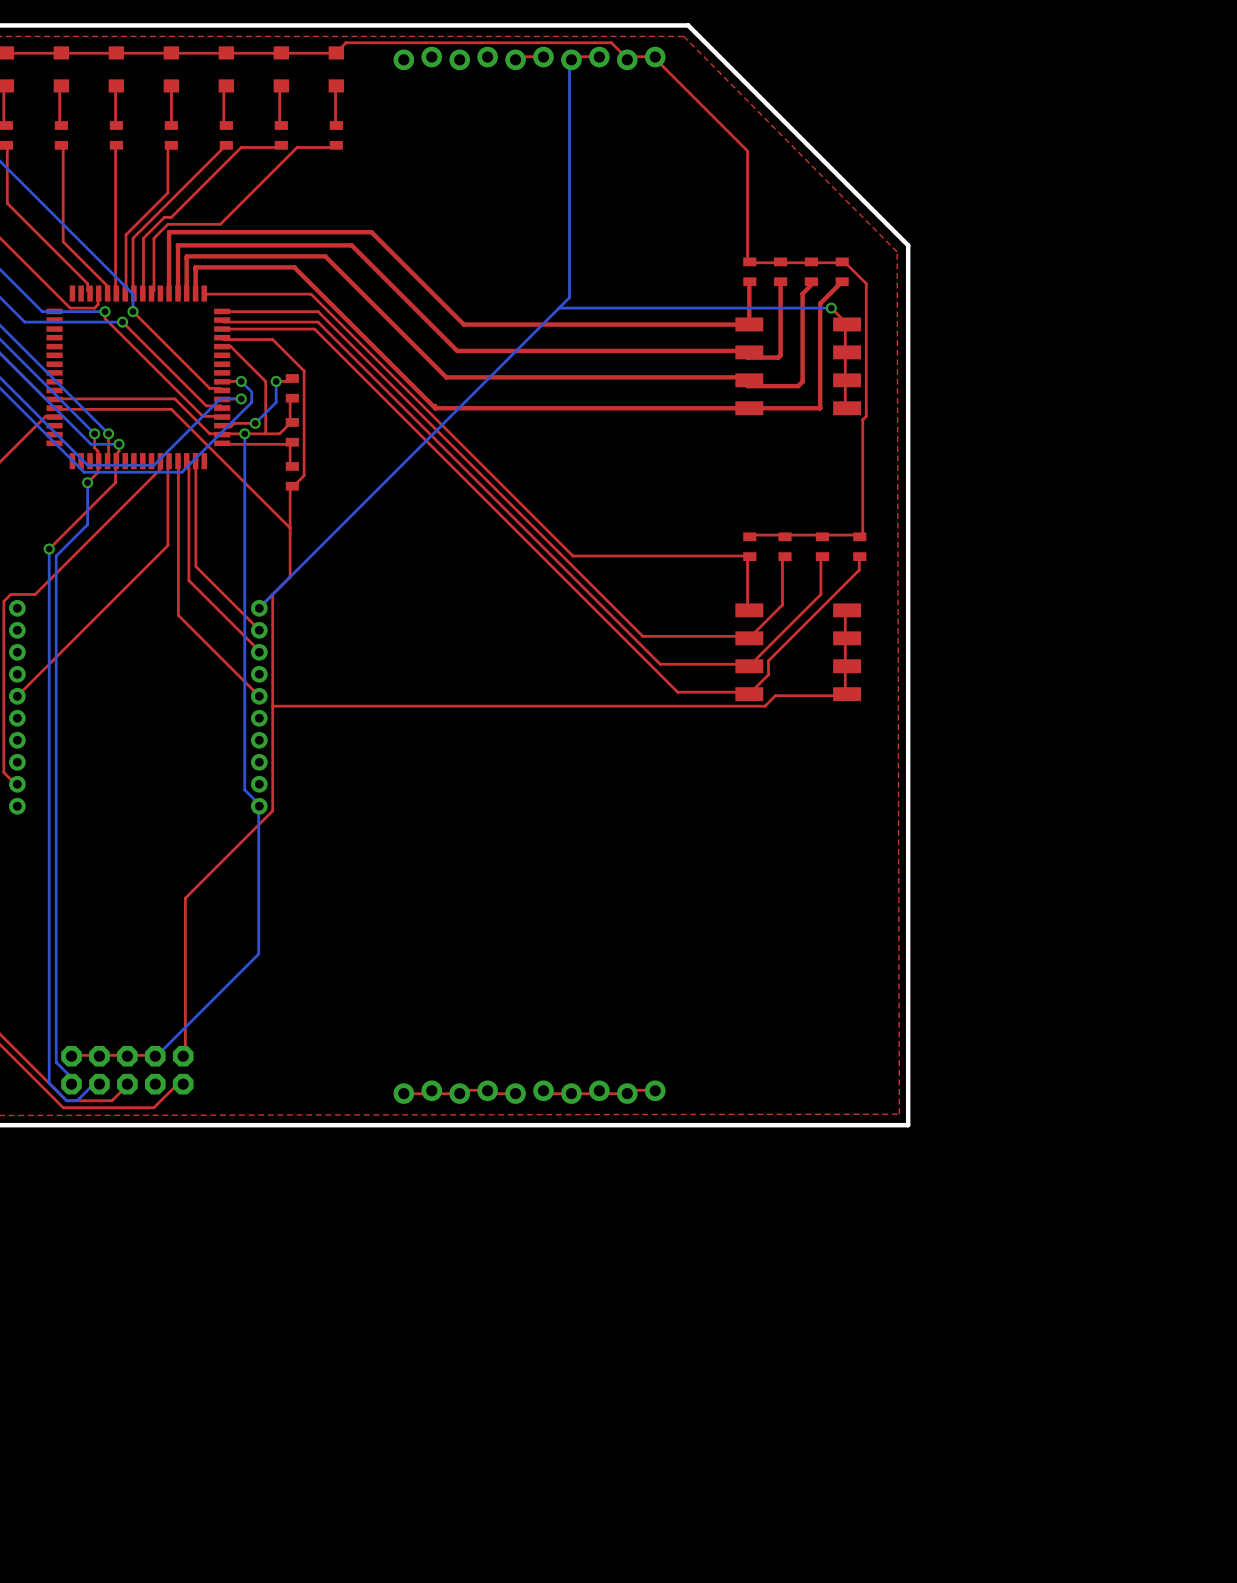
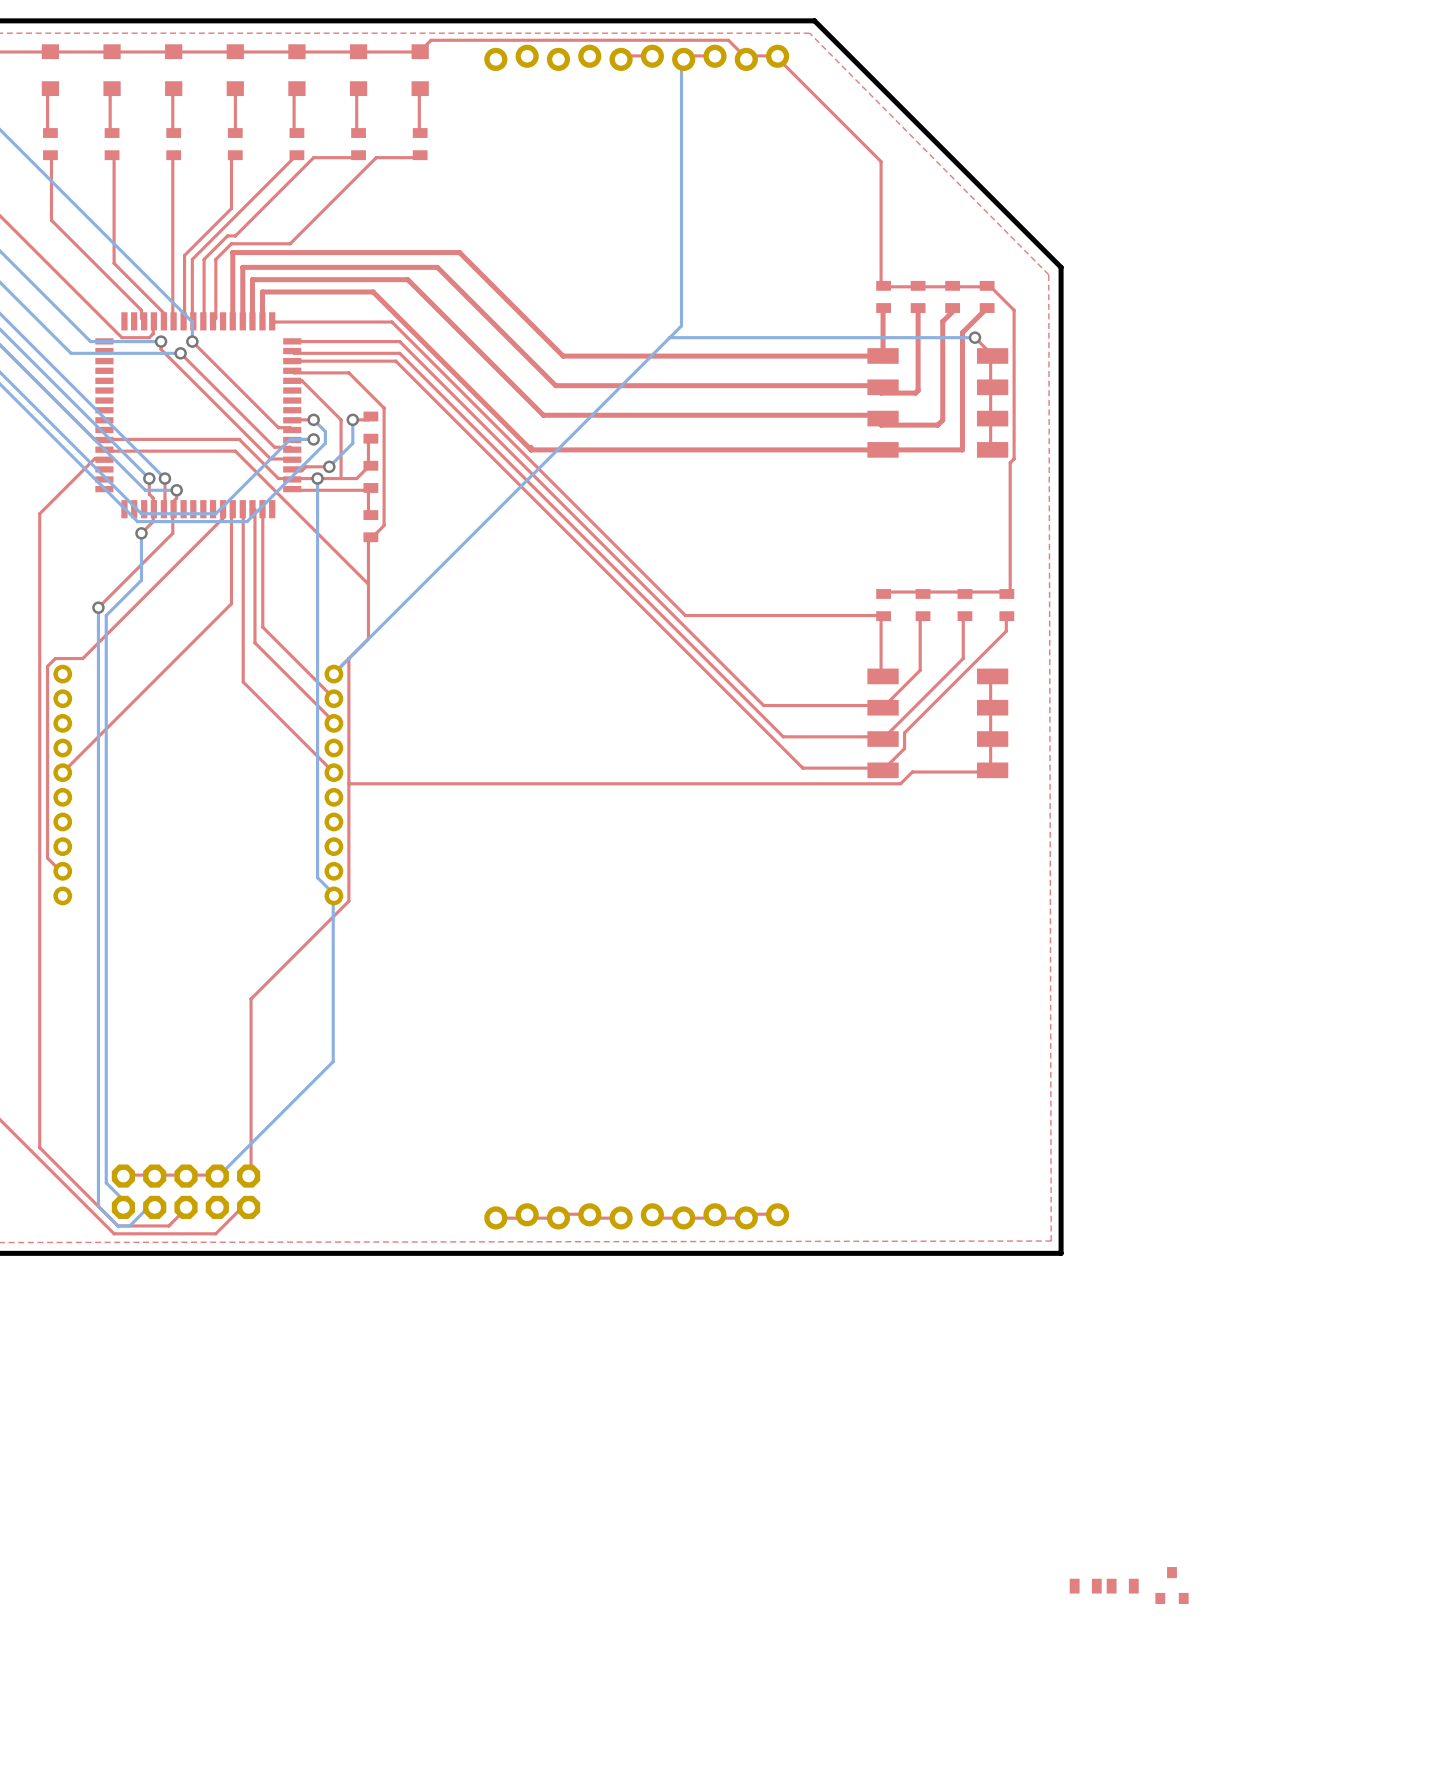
part: none -> (1172, 1585)
part: none -> (1085, 1586)
part: none -> (1122, 1586)

